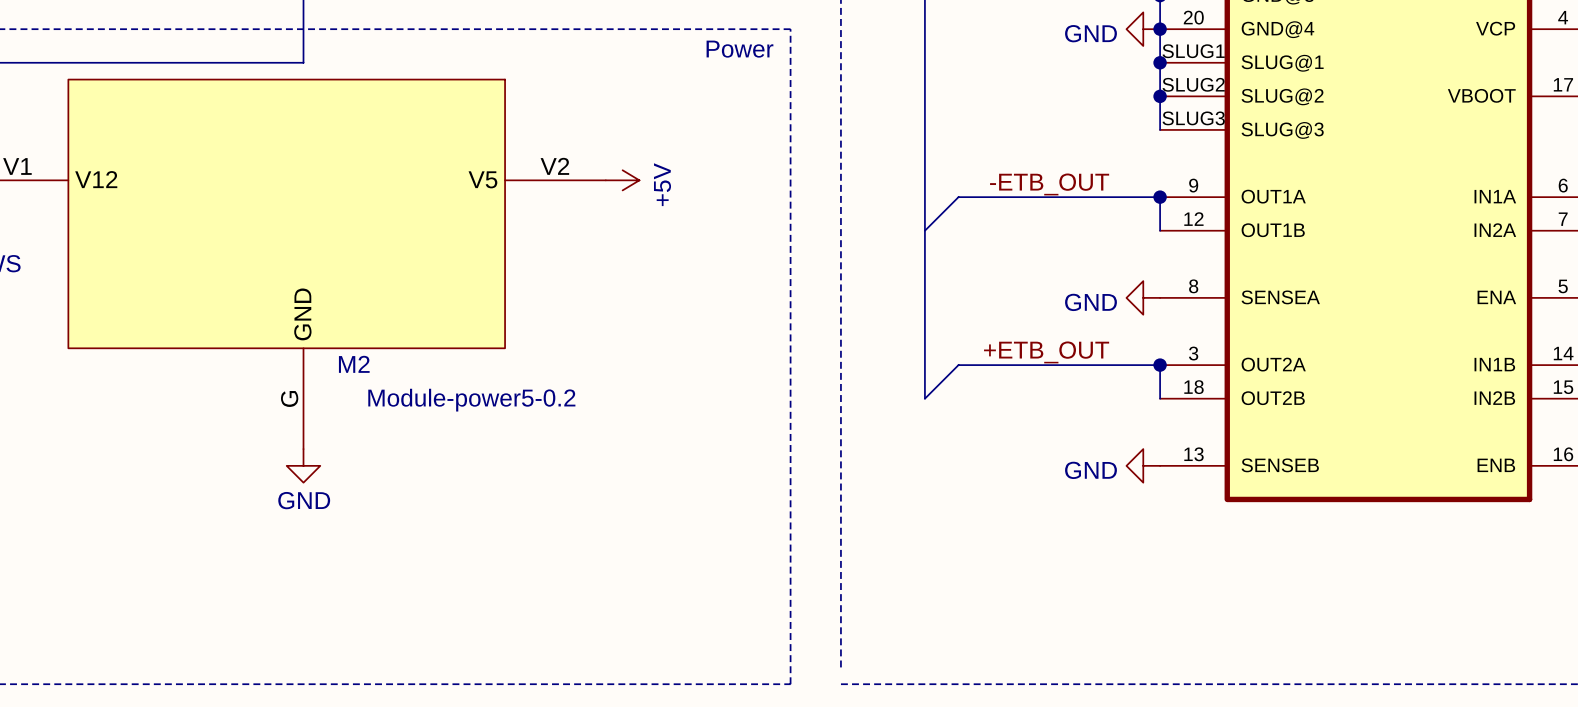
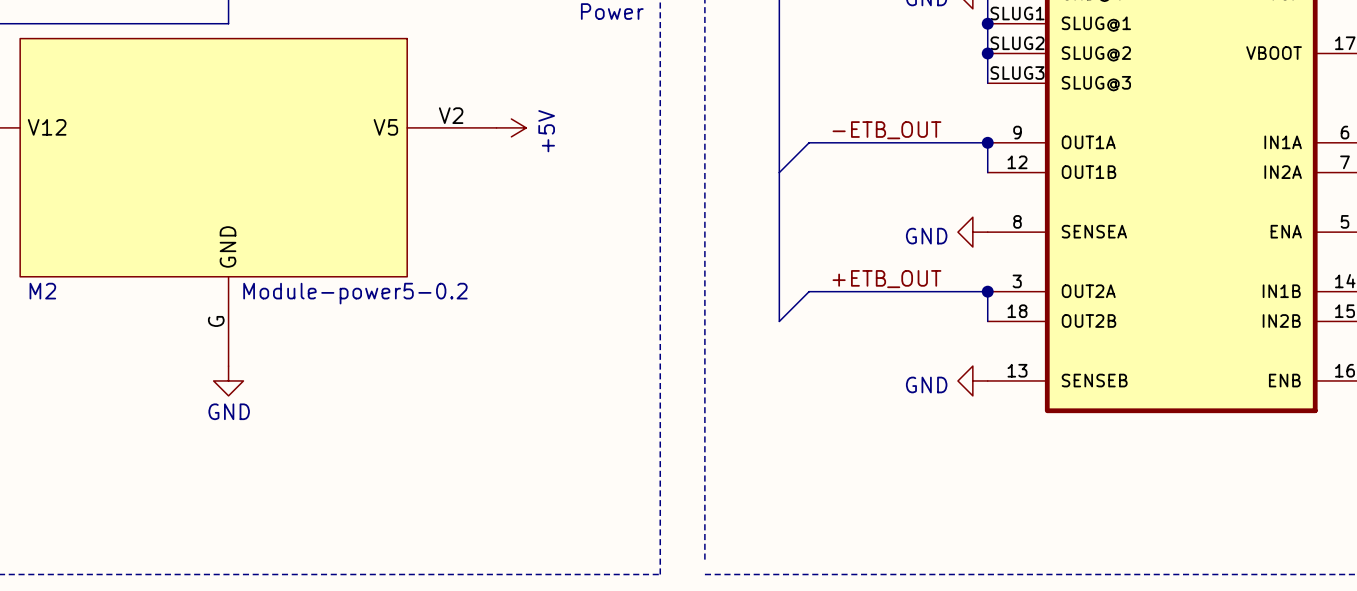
M2 name position: M2 (354, 364) -> M2 (42, 291)
M2 value position: Module-power5-0.2 (471, 400) -> Module-power5-0.2 (355, 293)

